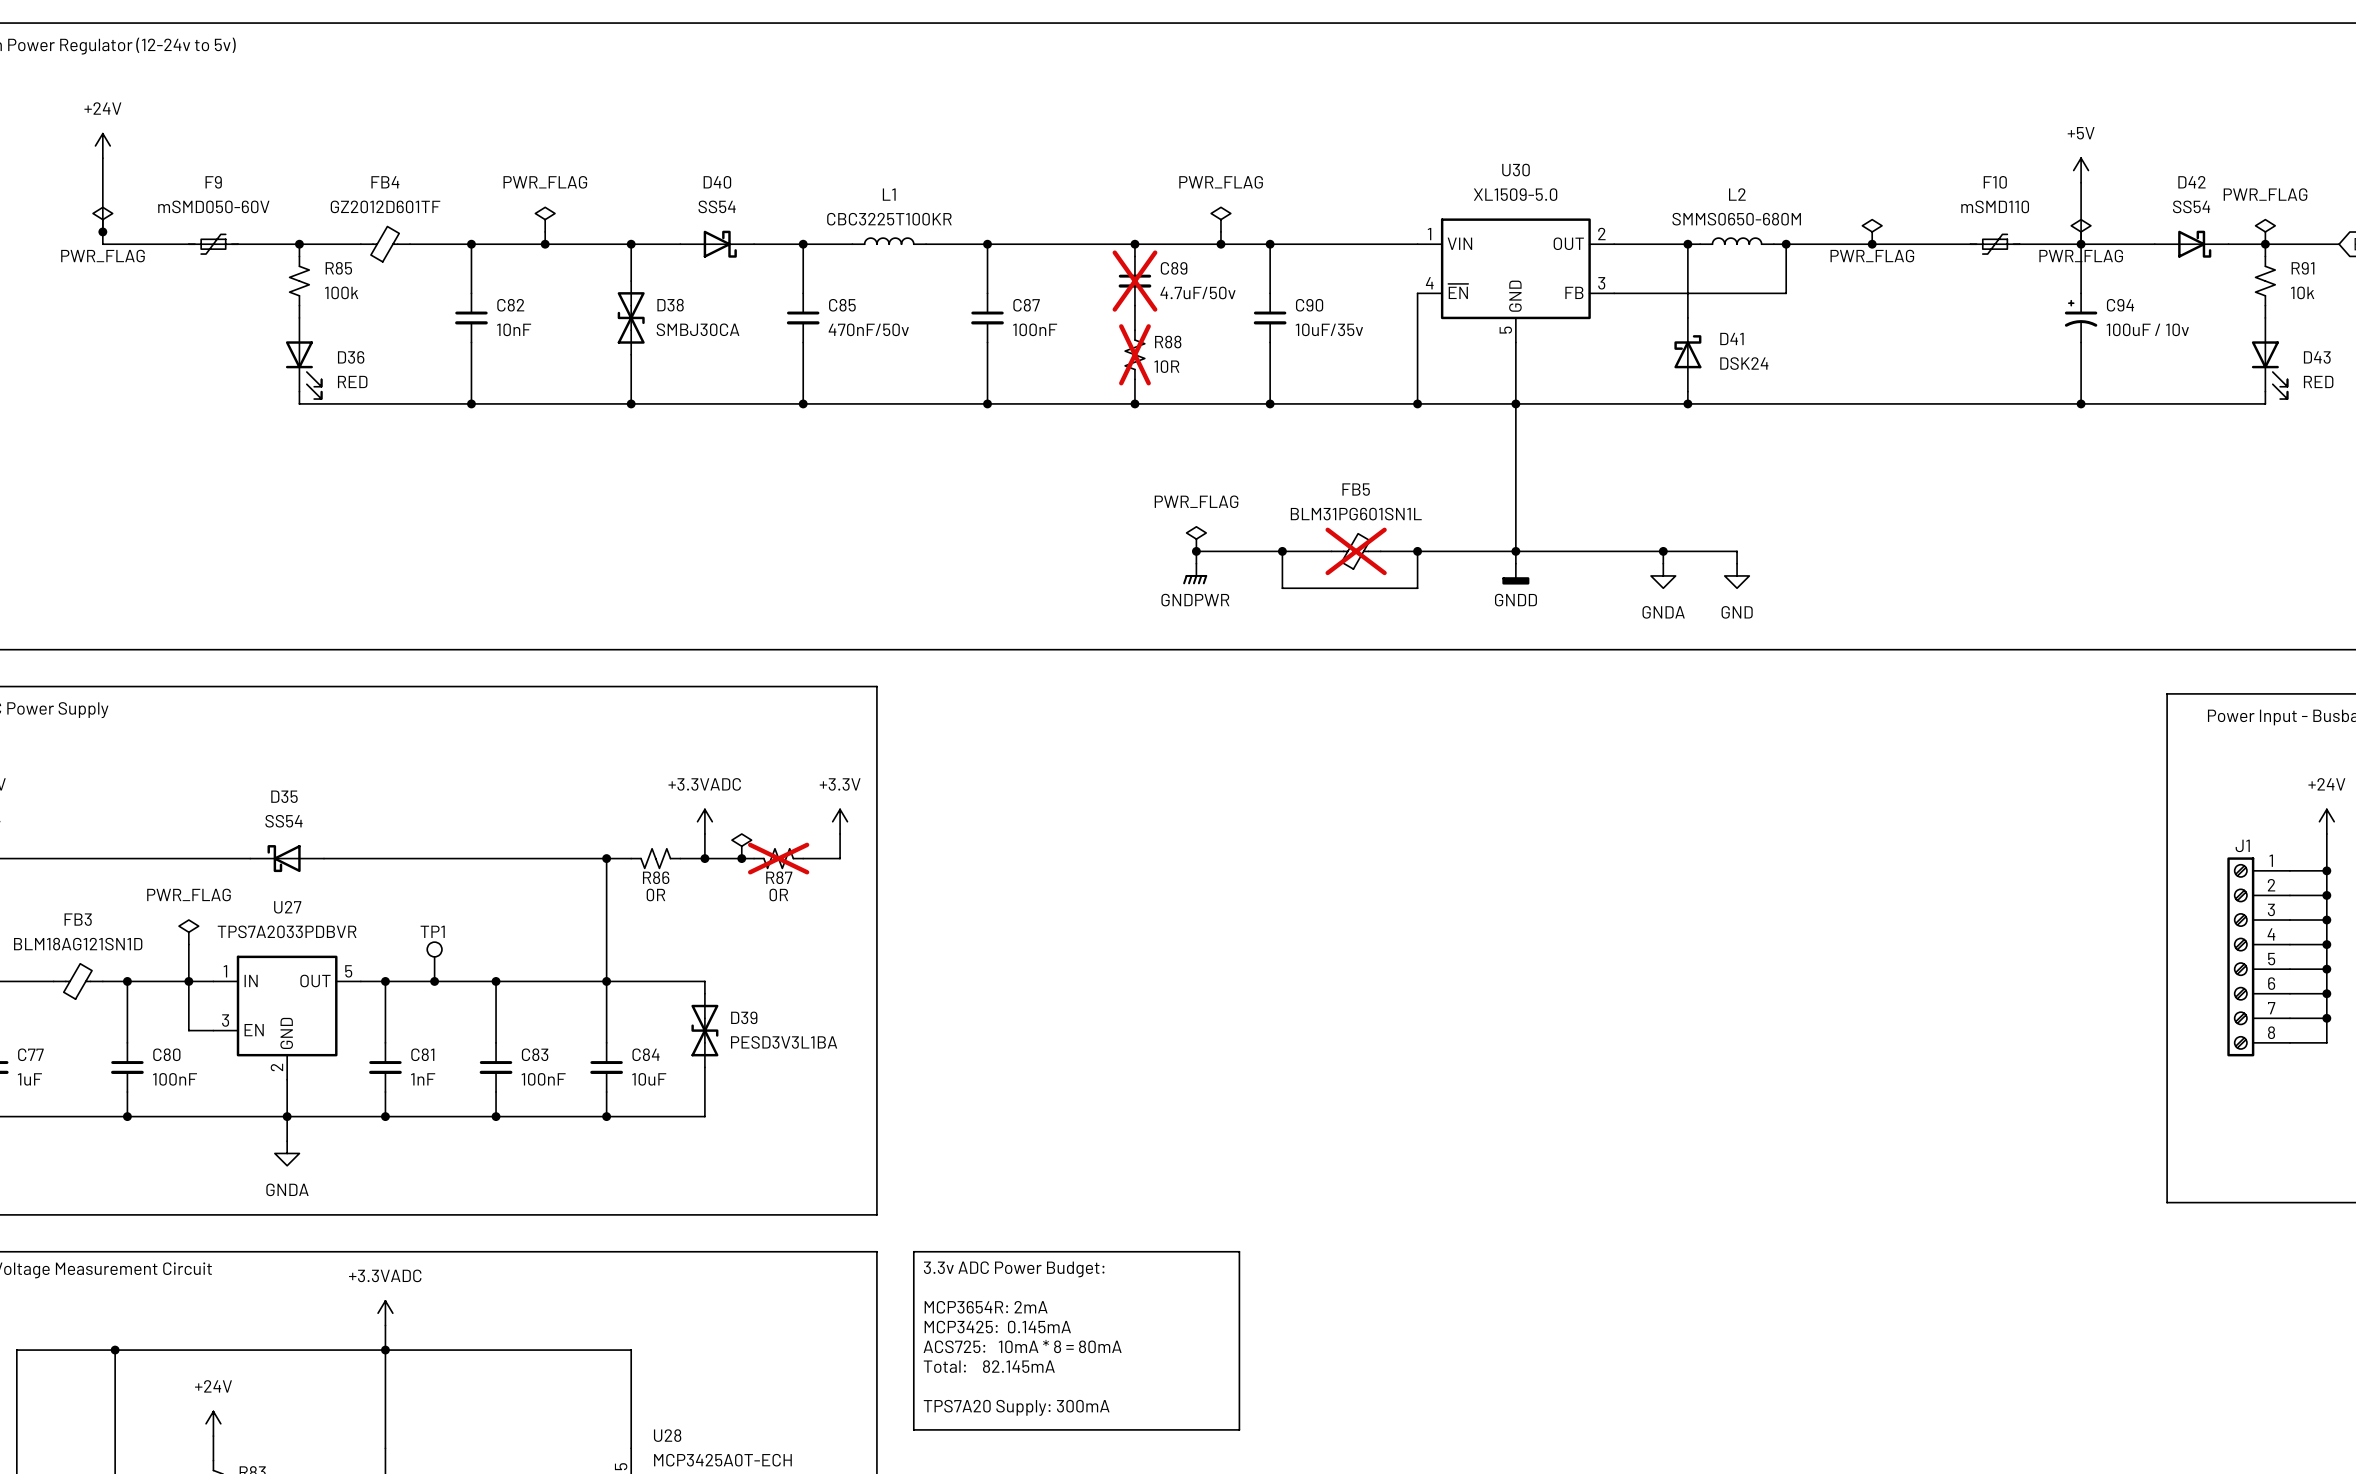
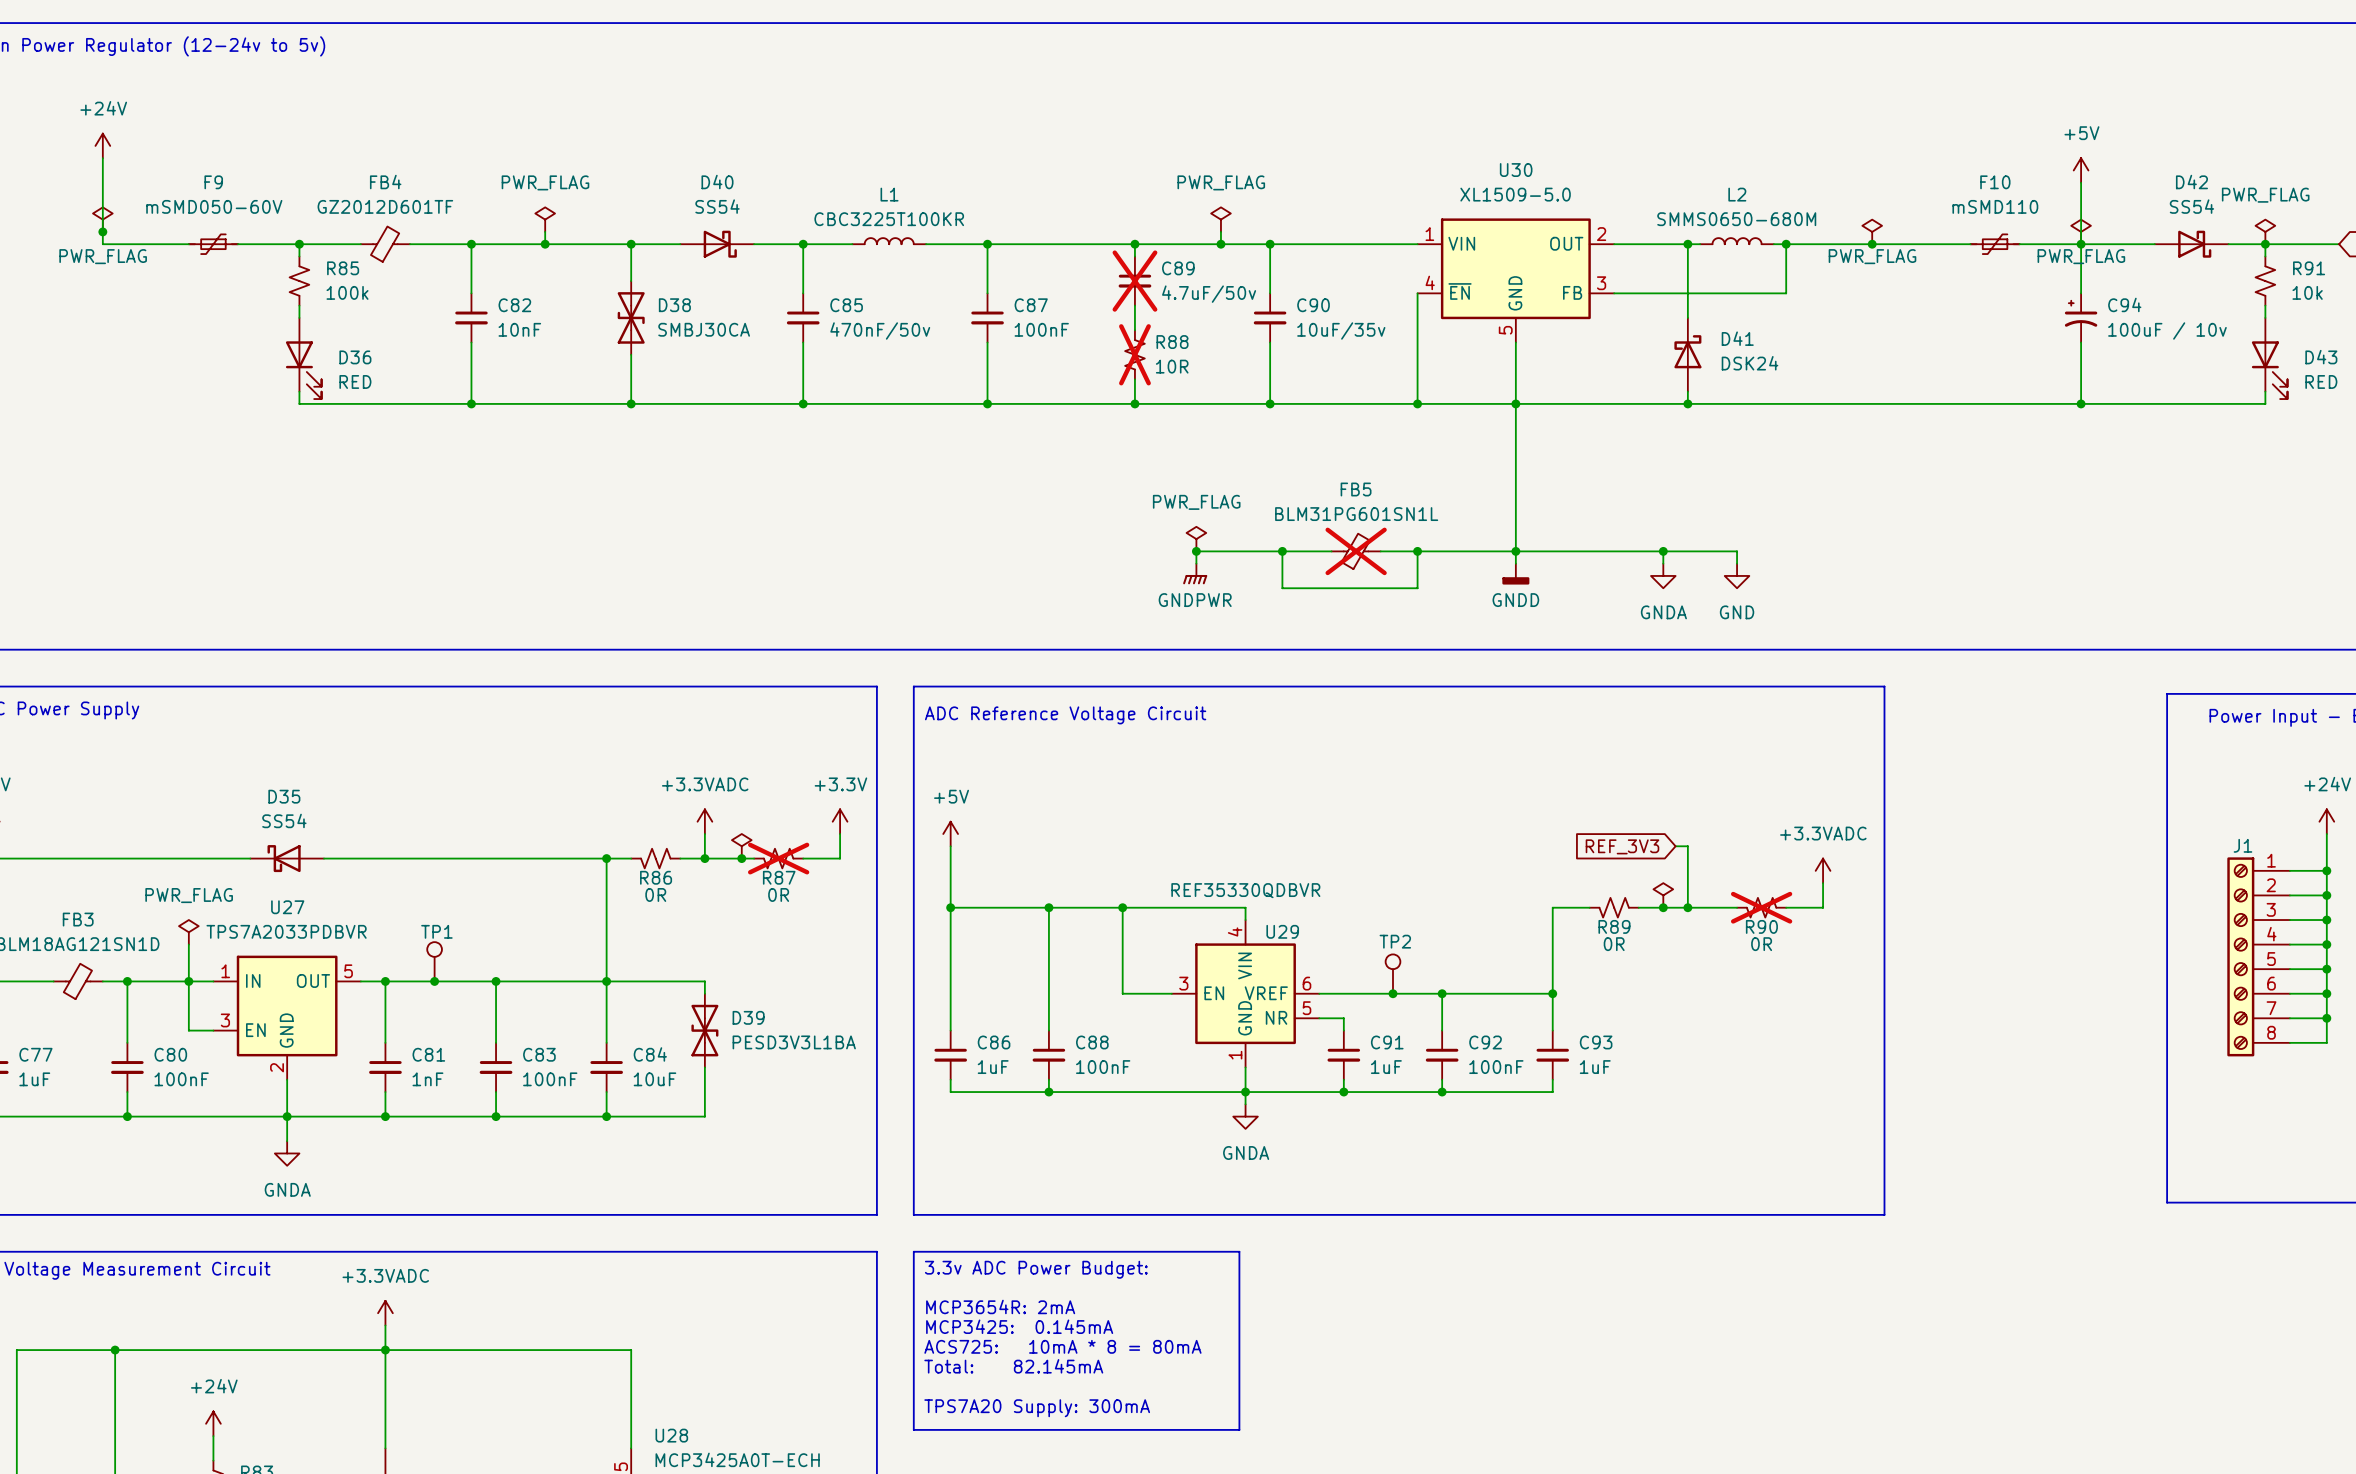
line: none -> (913, 686) (1884, 686) (1884, 1214) (913, 1214) (913, 686)
text: none -> ADC Reference Voltage Circuit (1065, 715)
power symbol: none -> +5V (950, 834)
wire: none -> (950, 846) (950, 1030)
global label: none -> REF_3V3 (1622, 846)
wire: none -> (1675, 846) (1687, 846) (1687, 907)
power symbol: none -> +3.3VADC (1823, 870)
wire: none -> (1823, 883) (1823, 907) (1786, 907)
power symbol: none -> (1663, 895)
wire: none -> (950, 907) (1245, 907) (1245, 920)
junction: none -> (950, 907)
wire: none -> (1048, 907) (1048, 1030)
junction: none -> (1048, 907)
wire: none -> (1122, 907) (1122, 993) (1171, 993)
junction: none -> (1122, 907)
wire: none -> (1589, 907) (1552, 907) (1552, 1030)
R89: none -> 0R (1614, 907)
wire: none -> (1638, 907) (1737, 907)
junction: none -> (1663, 907)
junction: none -> (1687, 907)
R90: none -> 0R (1761, 907)
TP2: none -> (1393, 974)
U29: none -> REF35330QDBVR (1245, 993)
wire: none -> (1319, 993) (1552, 993)
junction: none -> (1393, 993)
wire: none -> (1442, 993) (1442, 1030)
junction: none -> (1442, 993)
junction: none -> (1552, 993)
wire: none -> (1319, 1018) (1343, 1018) (1343, 1030)
C86: none -> 1uF (950, 1055)
C88: none -> 100nF (1048, 1055)
C91: none -> 1uF (1343, 1055)
C92: none -> 100nF (1442, 1055)
C93: none -> 1uF (1552, 1055)
wire: none -> (1245, 1067) (1245, 1104)
wire: none -> (950, 1079) (950, 1092) (1552, 1092) (1552, 1079)
wire: none -> (1048, 1079) (1048, 1092)
wire: none -> (1343, 1079) (1343, 1092)
wire: none -> (1442, 1079) (1442, 1092)
junction: none -> (1048, 1092)
junction: none -> (1245, 1092)
junction: none -> (1343, 1092)
junction: none -> (1442, 1092)
power symbol: none -> GNDA (1245, 1116)

